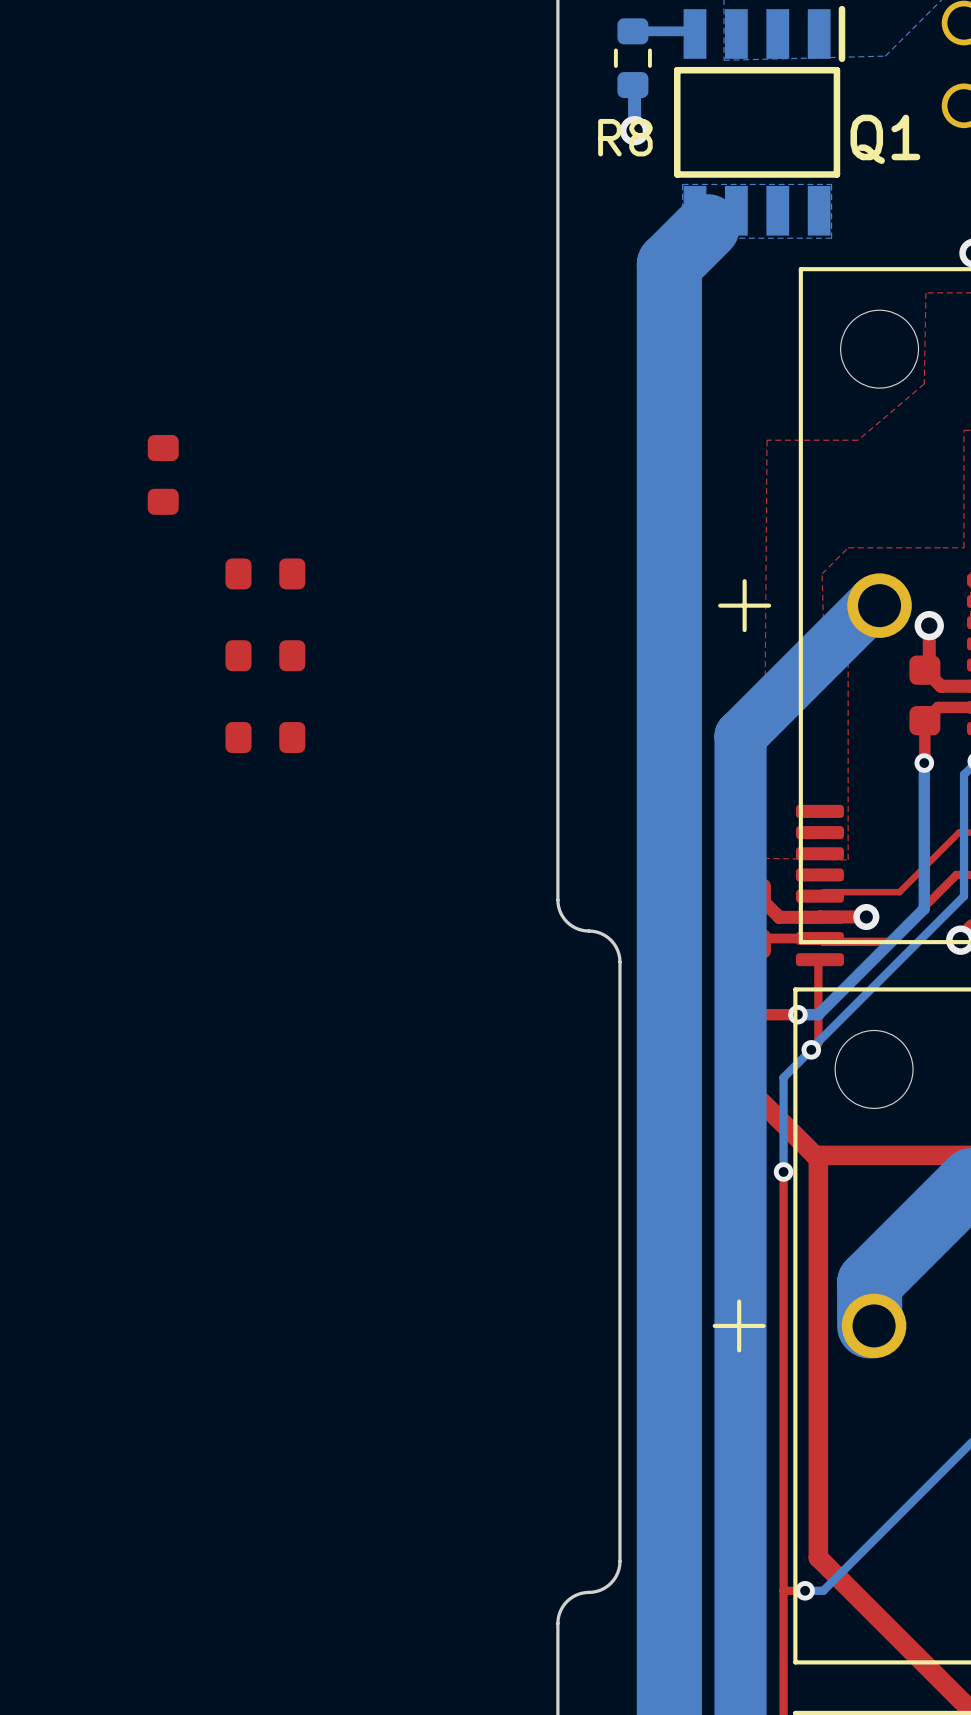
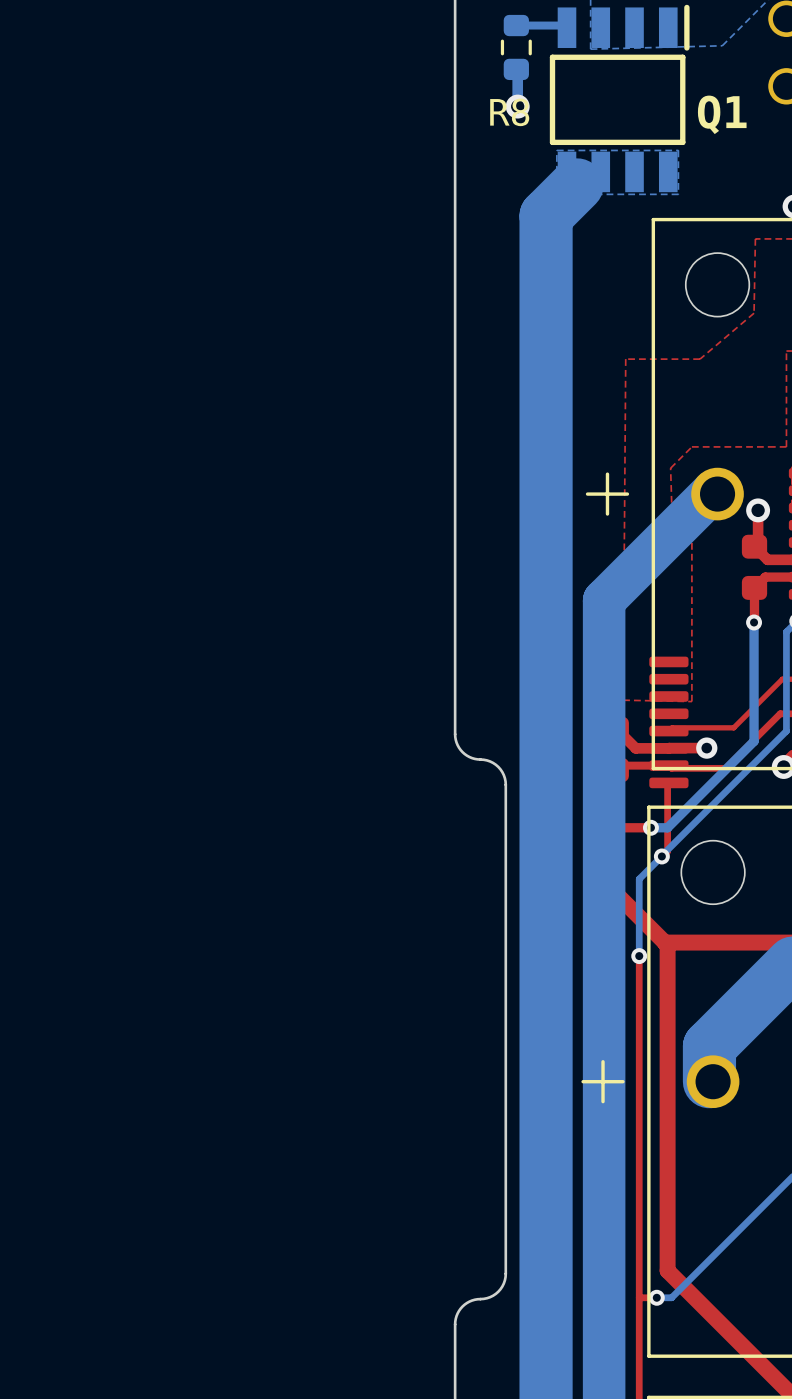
part: (163, 474) -> none
part: (265, 573) -> none
part: (265, 655) -> none
part: (265, 737) -> none

